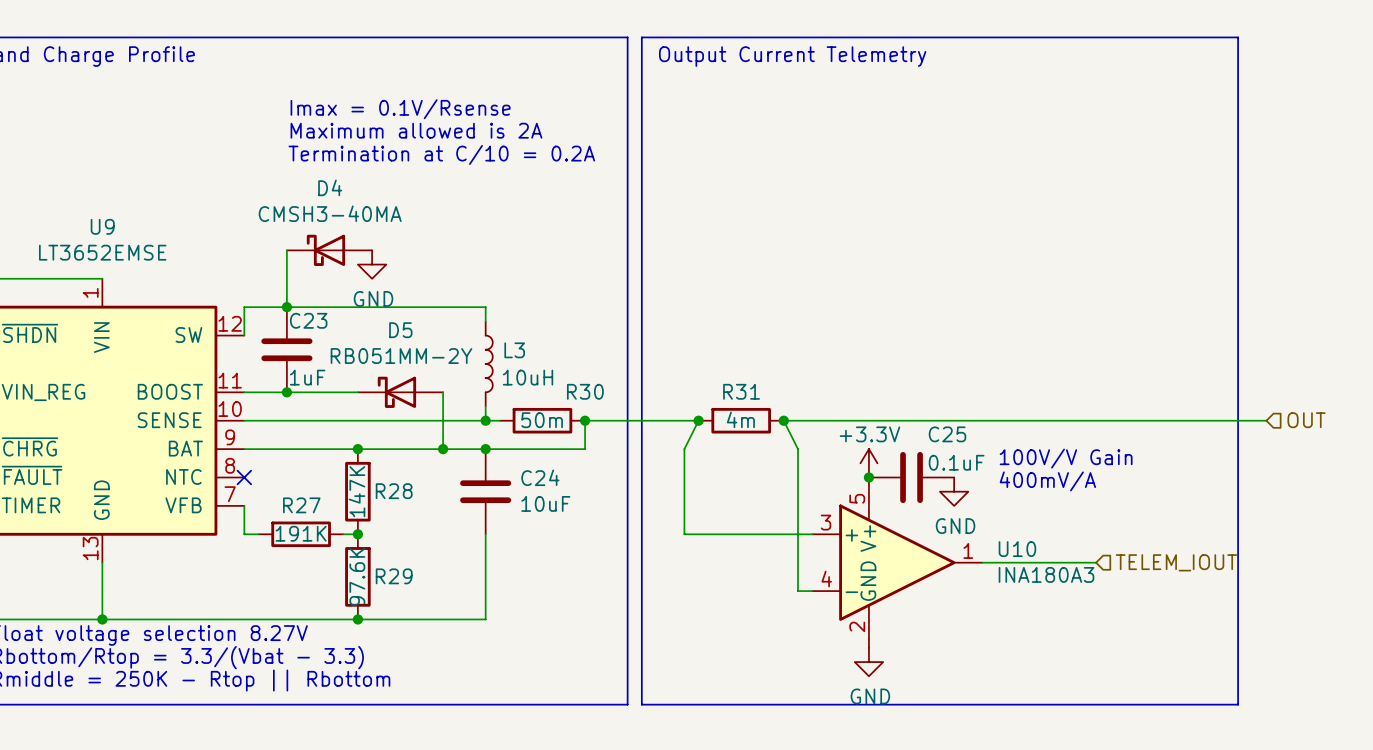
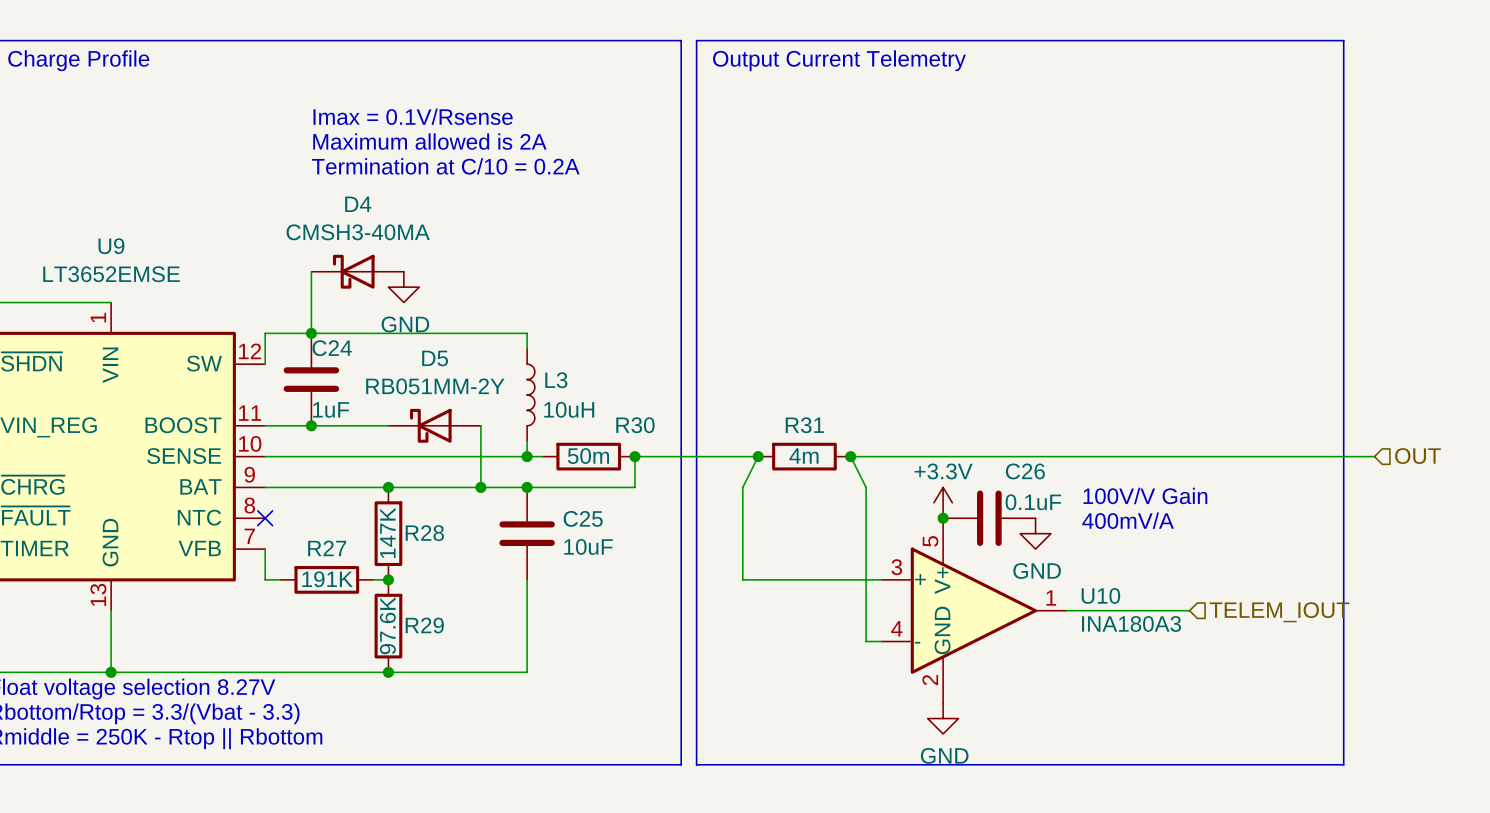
C23 name: C23 (308, 320) -> C24 (332, 348)
C25 name: C25 (947, 434) -> C26 (1025, 471)
C24 name: C24 (540, 477) -> C25 (583, 518)

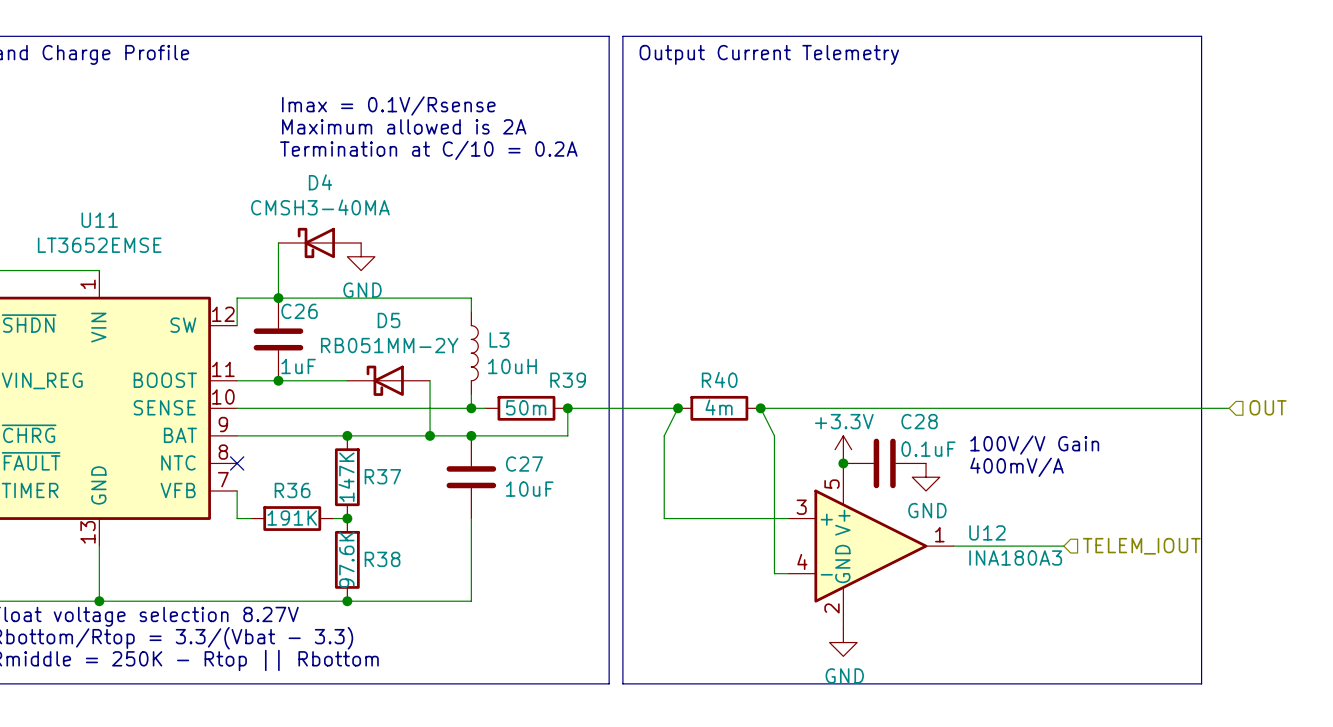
U9 name: U9 (111, 246) -> U11 (99, 220)
C24 name: C24 (332, 348) -> C26 (299, 311)
R30 name: R30 (635, 425) -> R39 (568, 380)
R31 name: R31 (804, 425) -> R40 (719, 379)
C26 name: C26 (1025, 471) -> C28 (919, 421)
C25 name: C25 (583, 518) -> C27 (524, 464)
R28 name: R28 (424, 533) -> R37 (382, 476)
R27 name: R27 (327, 548) -> R36 (292, 490)
U10 name: U10 (1100, 595) -> U12 (987, 532)
R29 name: R29 (424, 625) -> R38 (382, 559)

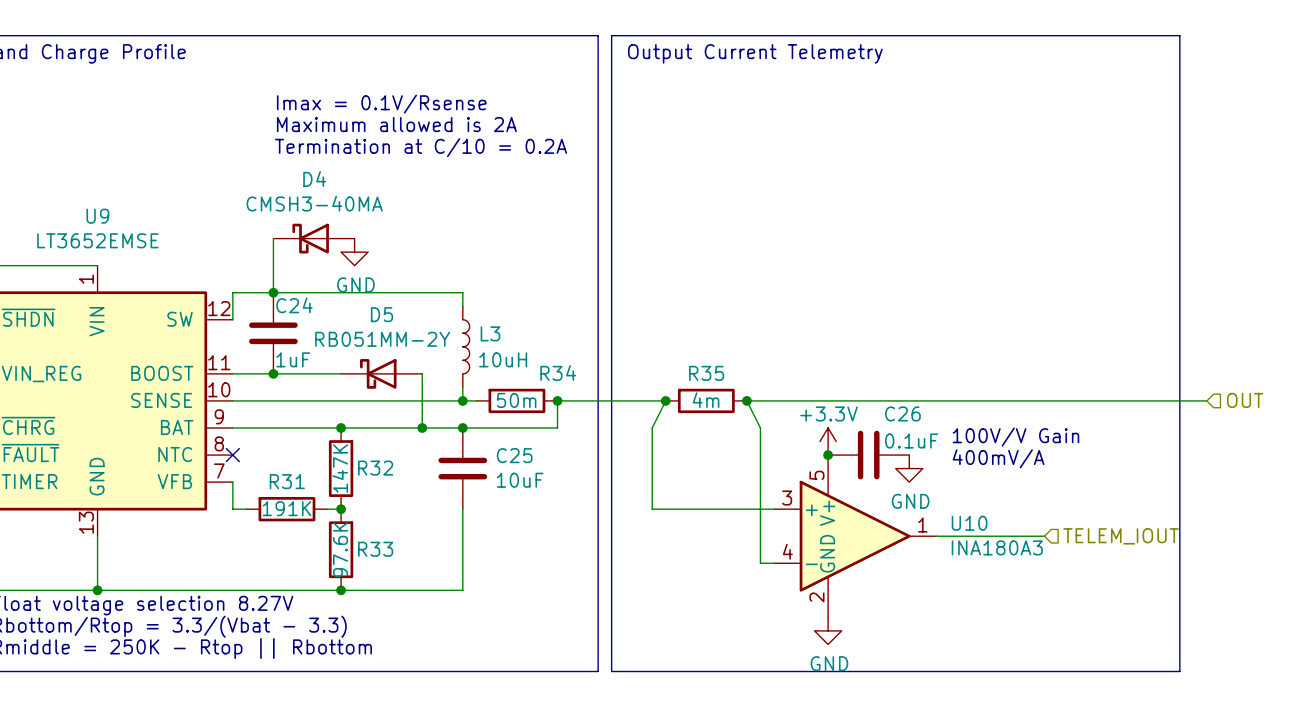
U11 name: U11 (99, 220) -> U9 (97, 216)
C26 name: C26 (299, 311) -> C24 (294, 305)
R40 name: R40 (719, 379) -> R35 (706, 373)
R39 name: R39 (568, 380) -> R34 (558, 373)
C28 name: C28 (919, 421) -> C26 (902, 413)
C27 name: C27 (524, 464) -> C25 (514, 455)
R37 name: R37 (382, 476) -> R32 (375, 468)
R36 name: R36 (292, 490) -> R31 (287, 481)
U12 name: U12 (987, 532) -> U10 (969, 523)
R38 name: R38 (382, 559) -> R33 (375, 549)

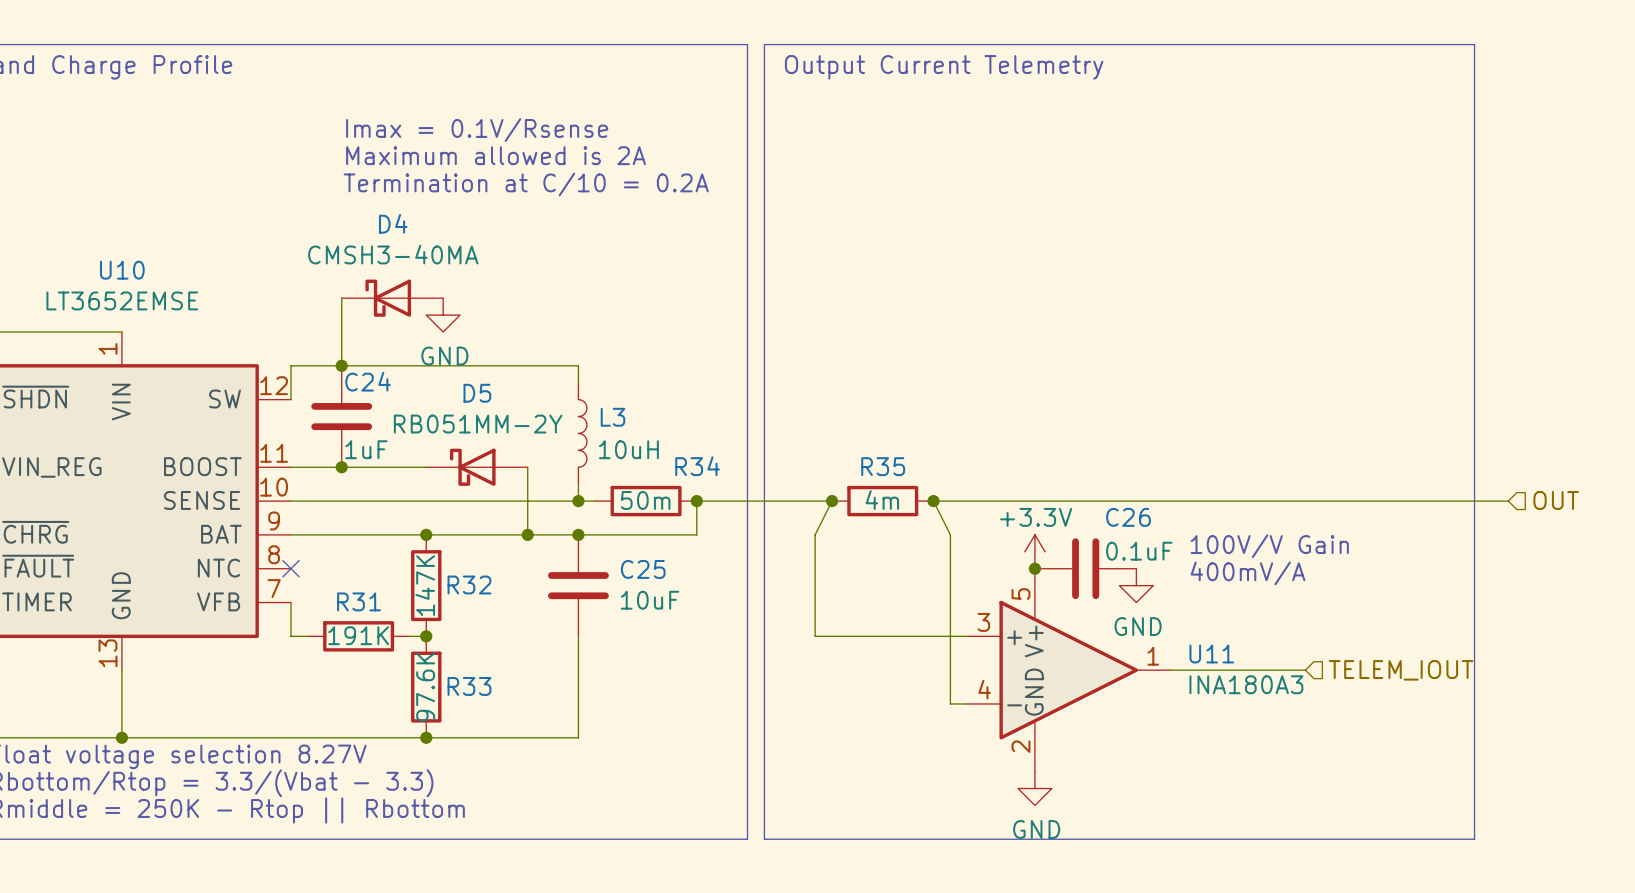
U9 name: U9 (97, 216) -> U10 (122, 270)
U10 name: U10 (969, 523) -> U11 (1211, 653)

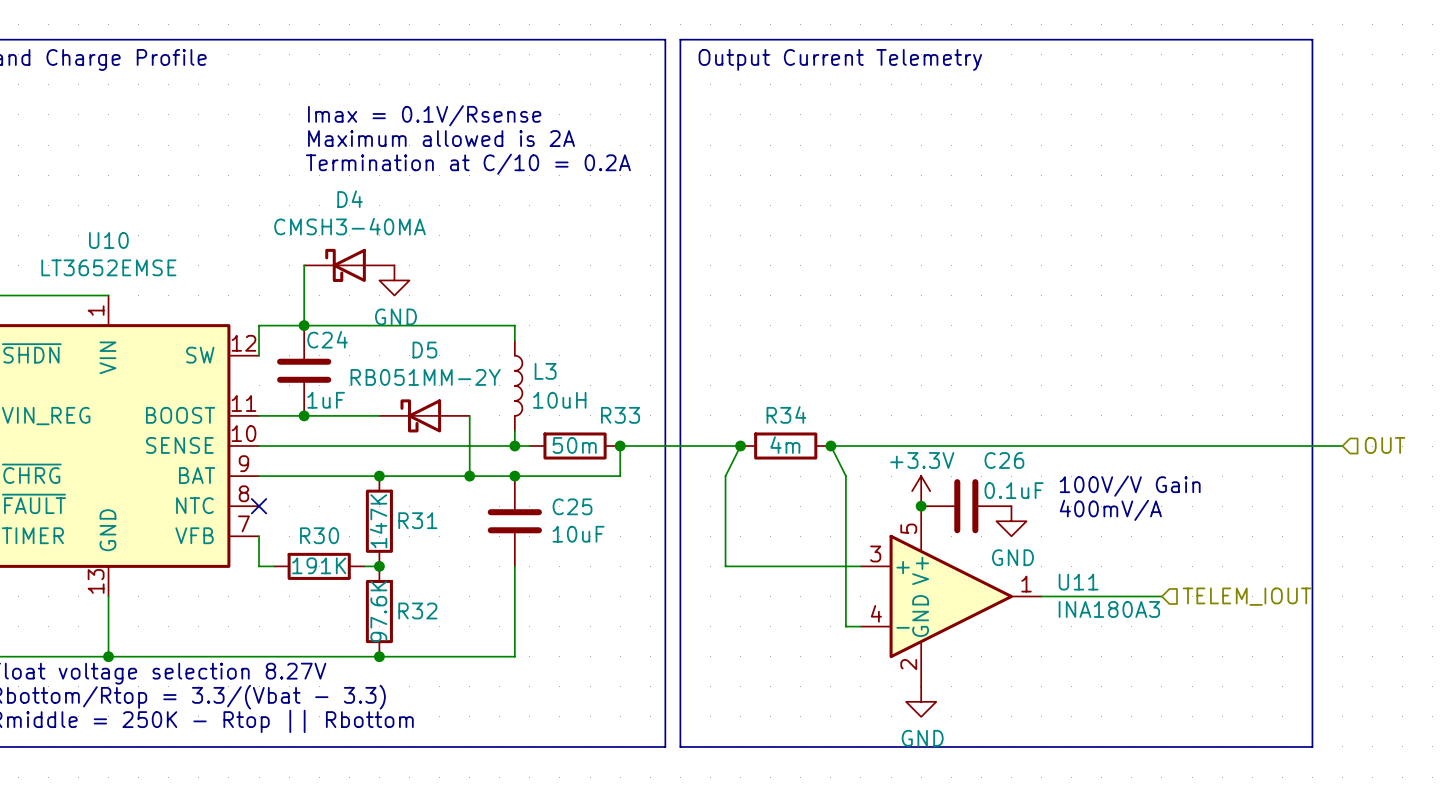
R34 name: R34 (697, 466) -> R33 (620, 415)
R35 name: R35 (883, 466) -> R34 (786, 414)
R32 name: R32 (469, 584) -> R31 (417, 520)
R31 name: R31 (359, 601) -> R30 (319, 535)
R33 name: R33 (469, 686) -> R32 (417, 610)

